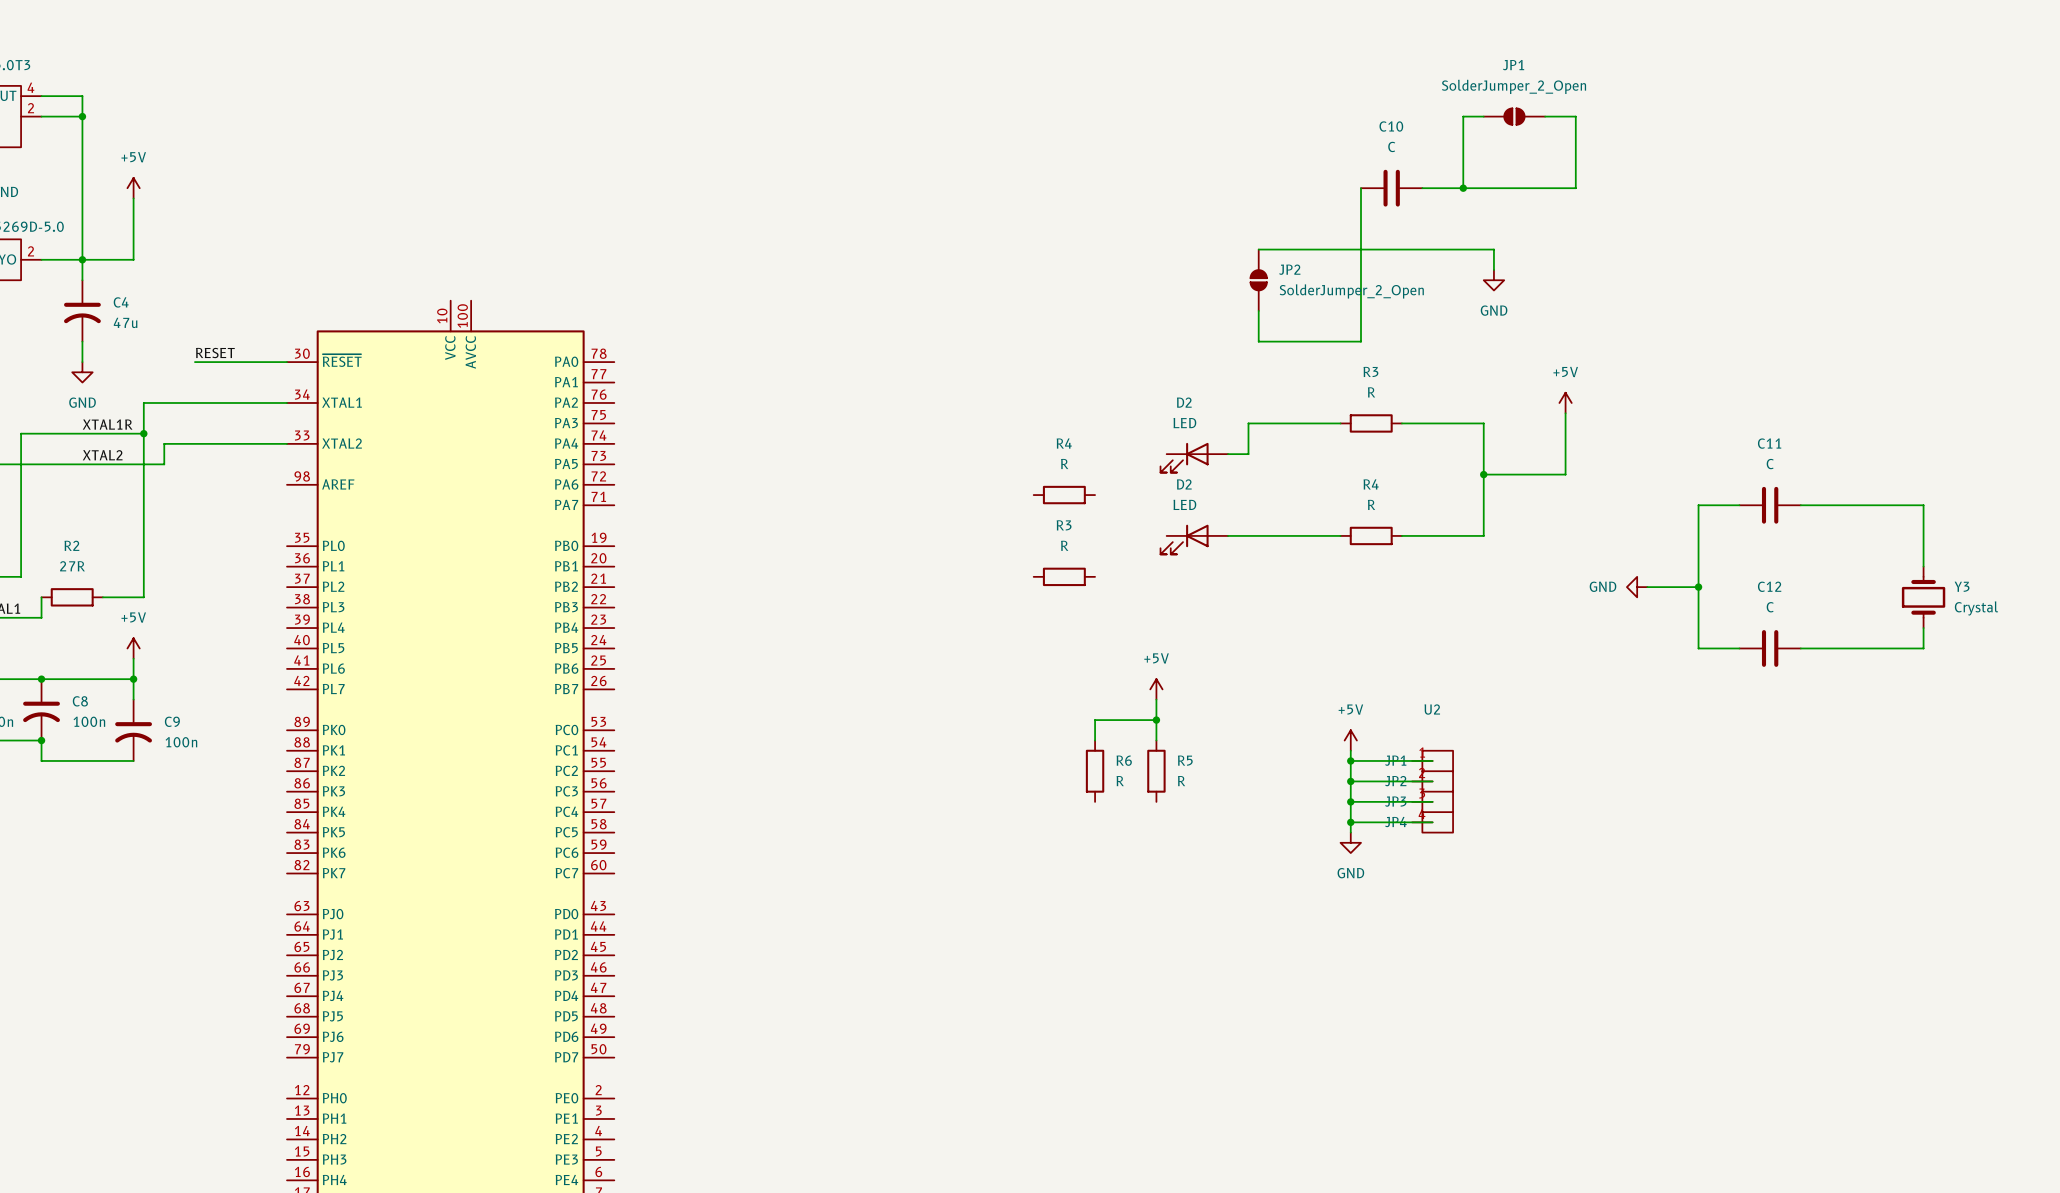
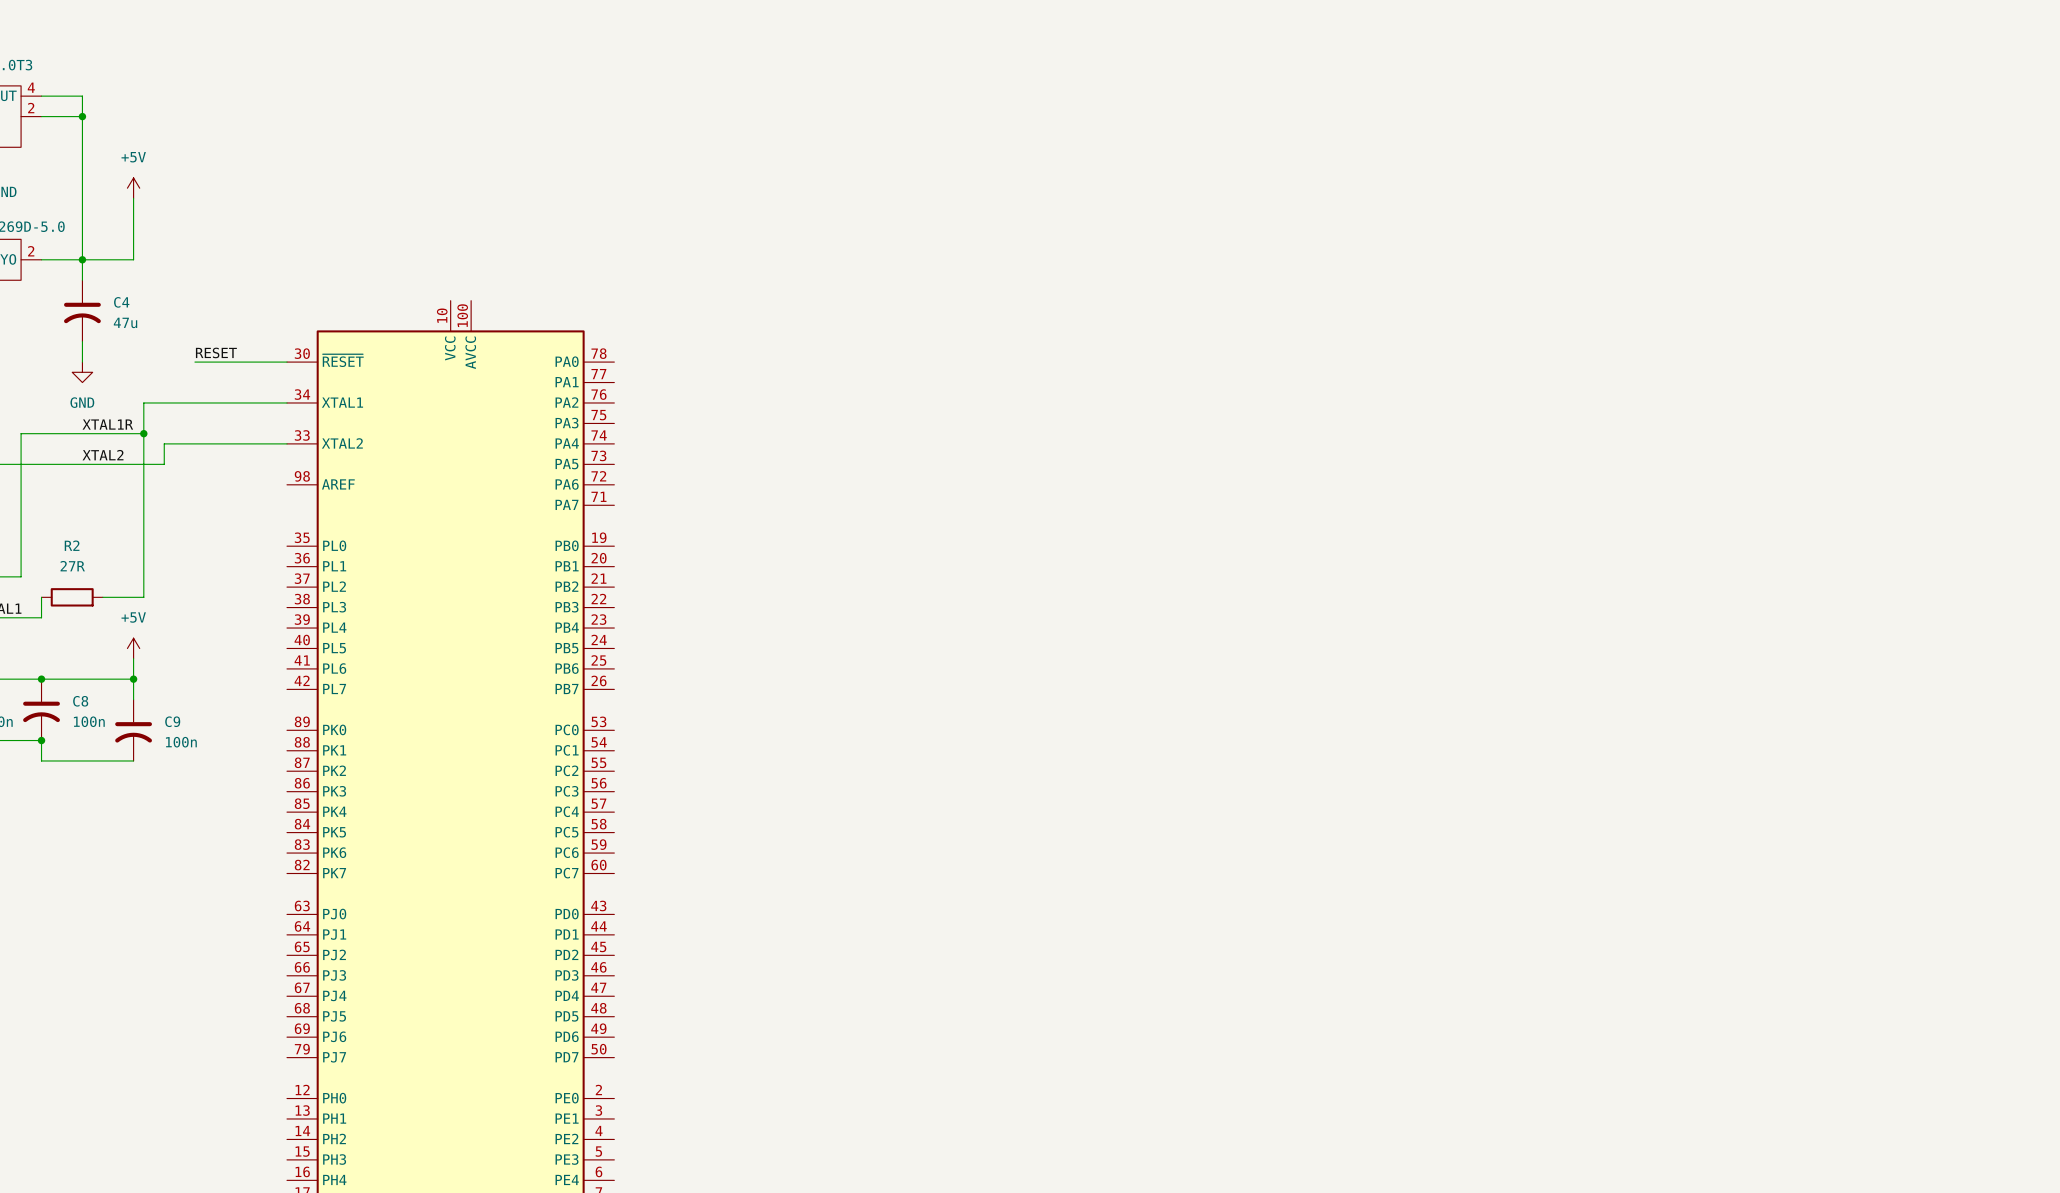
wire: (1483, 116) (1463, 116) (1463, 188) -> none
JP1: SolderJumper_2_Open (1514, 116) -> none
wire: (1545, 116) (1575, 116) (1575, 188) (1422, 188) -> none
wire: (1361, 188) (1361, 341) (1258, 341) (1258, 310) -> none
C10: C (1391, 188) -> none
junction: (1463, 188) -> none
wire: (1258, 249) (1493, 249) (1493, 270) -> none
JP2: SolderJumper_2_Open (1258, 280) -> none
power symbol: GND (1493, 280) -> none
power symbol: +5V (1565, 402) -> none
wire: (1565, 413) (1565, 474) (1483, 474) -> none
wire: (1340, 423) (1248, 423) (1248, 454) (1228, 454) -> none
R3: R (1371, 423) -> none
wire: (1401, 423) (1483, 423) (1483, 535) (1401, 535) -> none
D2: LED (1194, 457) -> none
junction: (1483, 474) -> none
R4: R (1064, 495) -> none
wire: (1739, 505) (1698, 505) (1698, 648) (1739, 648) -> none
C11: C (1770, 505) -> none
wire: (1800, 505) (1923, 505) (1923, 566) -> none
wire: (1228, 535) (1340, 535) -> none
R4: R (1371, 535) -> none
D2: LED (1194, 539) -> none
R3: R (1064, 576) -> none
power symbol: GND (1637, 587) -> none
wire: (1647, 587) (1698, 587) -> none
junction: (1698, 587) -> none
Y3: Crystal (1923, 597) -> none
wire: (1923, 628) (1923, 648) (1800, 648) -> none
C12: C (1770, 648) -> none
power symbol: +5V (1156, 689) -> none
wire: (1156, 699) (1156, 740) -> none
wire: (1156, 720) (1095, 720) (1095, 740) -> none
junction: (1156, 720) -> none
power symbol: +5V (1350, 740) -> none
wire: (1350, 750) (1350, 832) -> none
wire: (1350, 760) (1432, 760) -> none
junction: (1350, 760) -> none
R6: R (1095, 771) -> none
R5: R (1156, 771) -> none
wire: (1350, 781) (1432, 781) -> none
junction: (1350, 781) -> none
U2: (1432, 791) -> none
wire: (1350, 801) (1432, 801) -> none
junction: (1350, 801) -> none
wire: (1350, 822) (1432, 822) -> none
junction: (1350, 822) -> none
power symbol: GND (1350, 842) -> none

